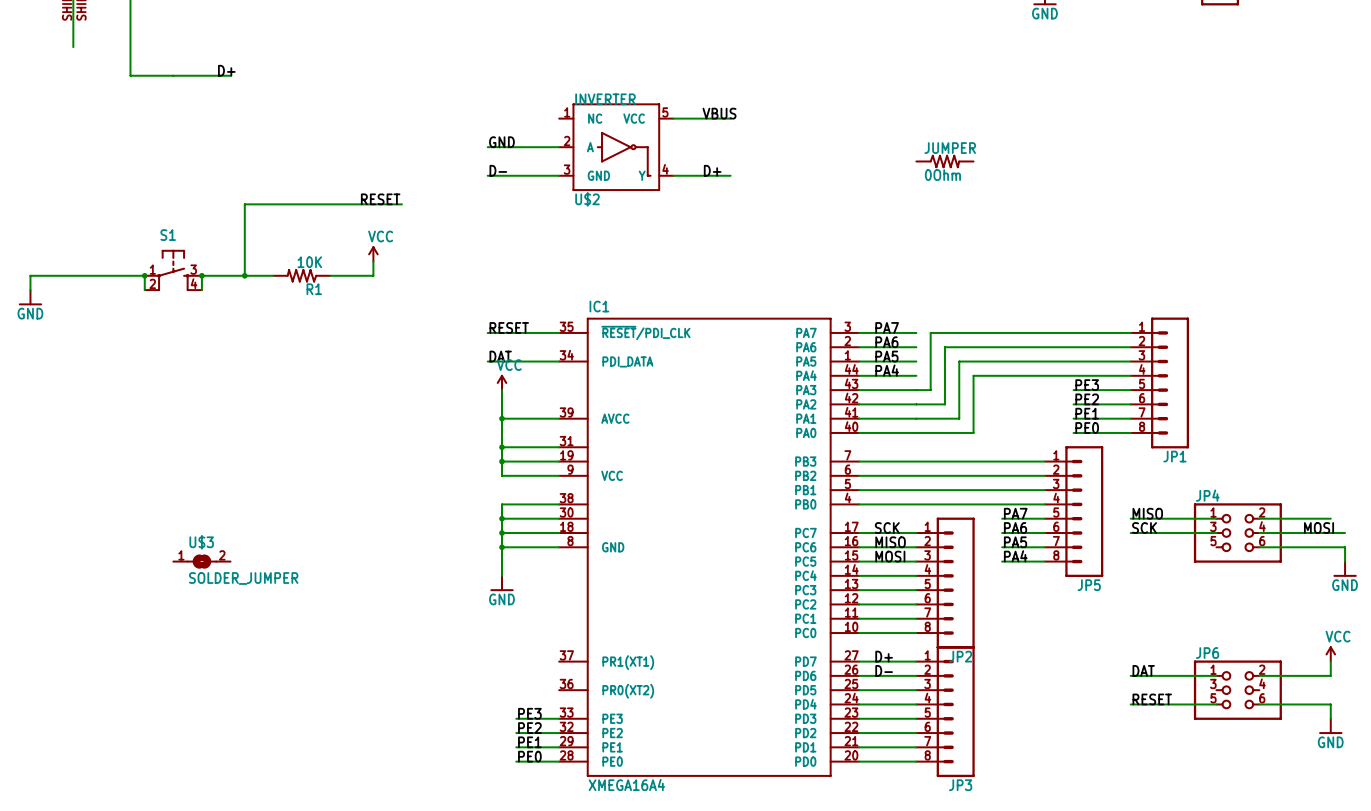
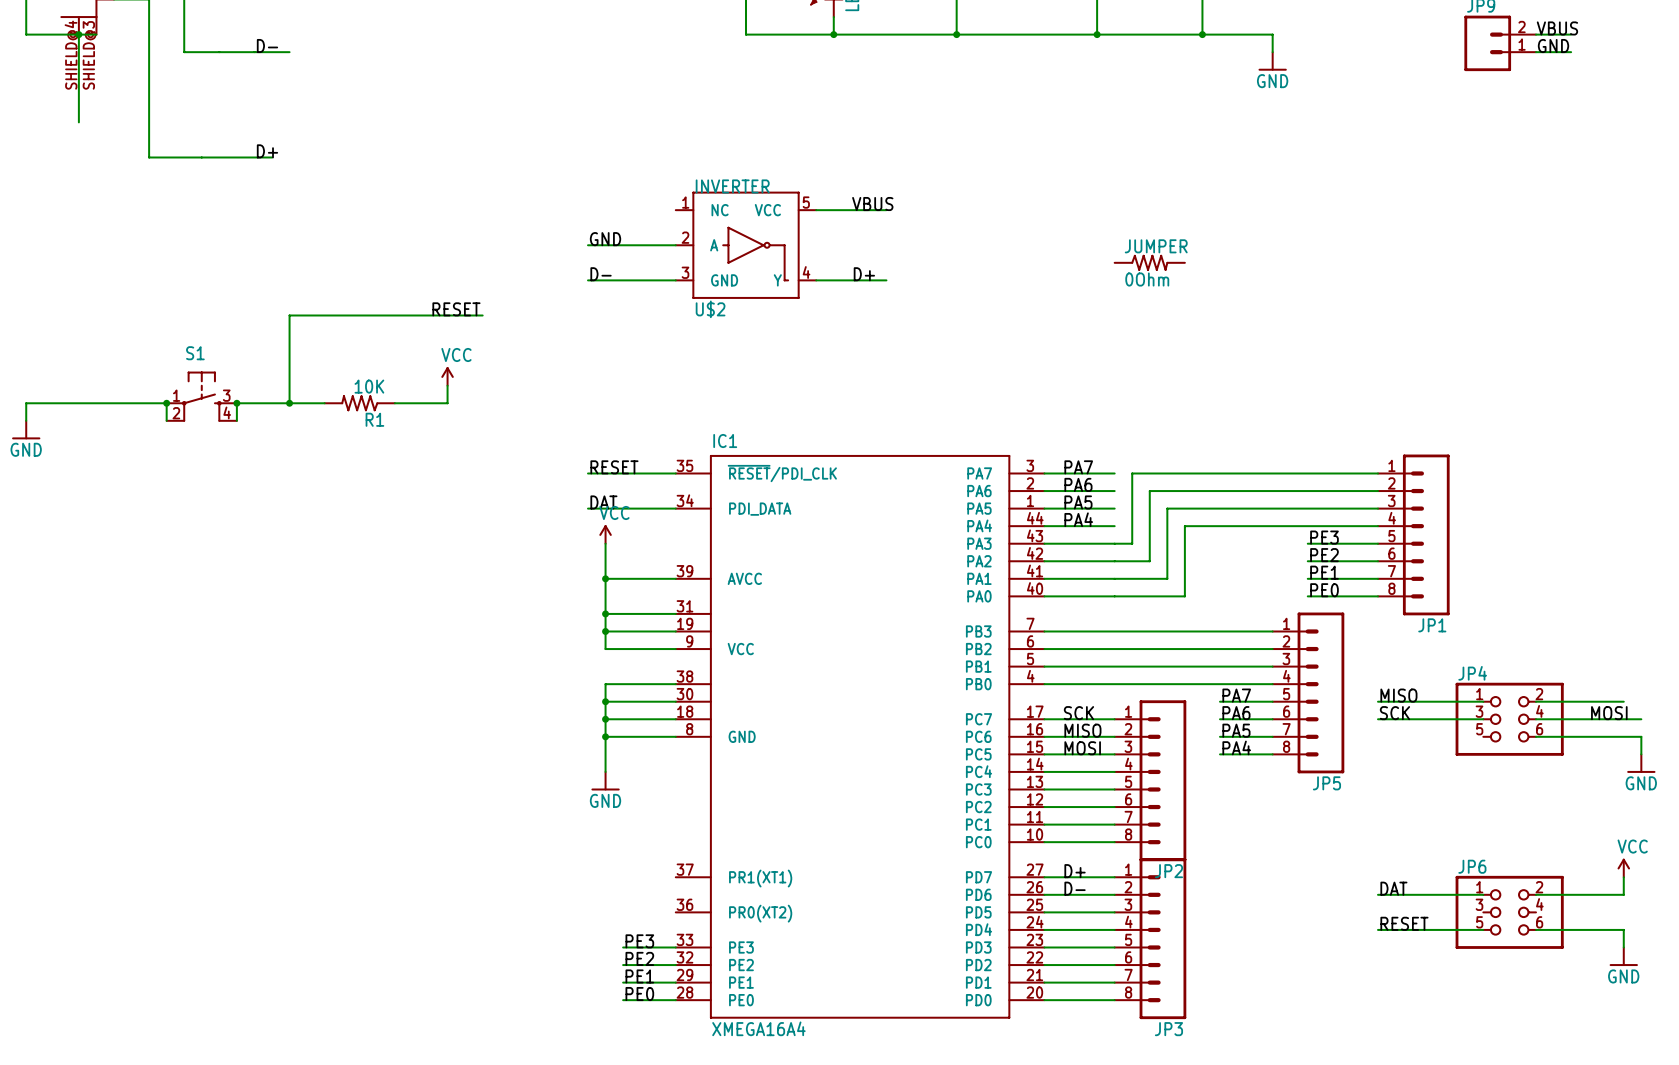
U$3: SOLDER_JUMPER (201, 561) -> none

